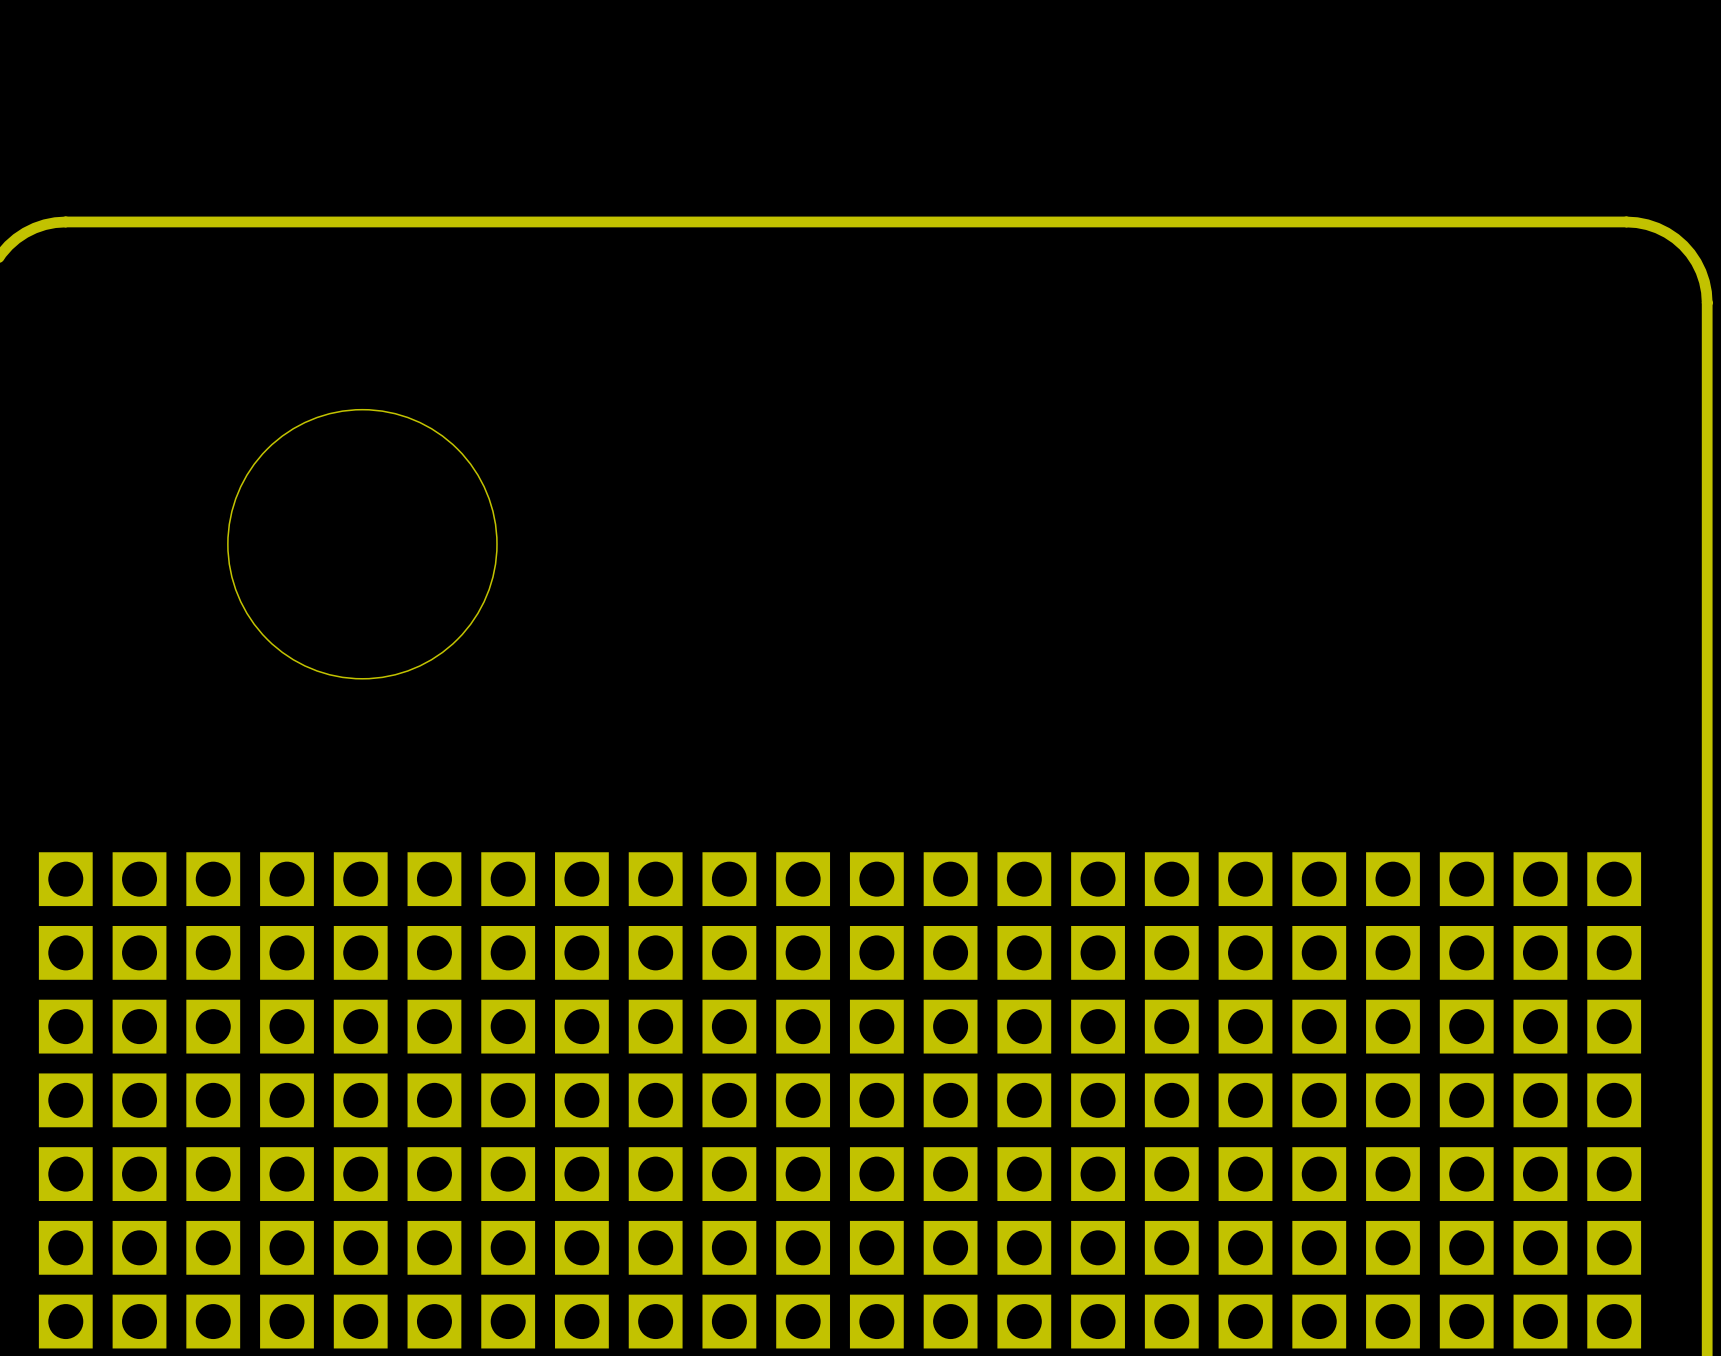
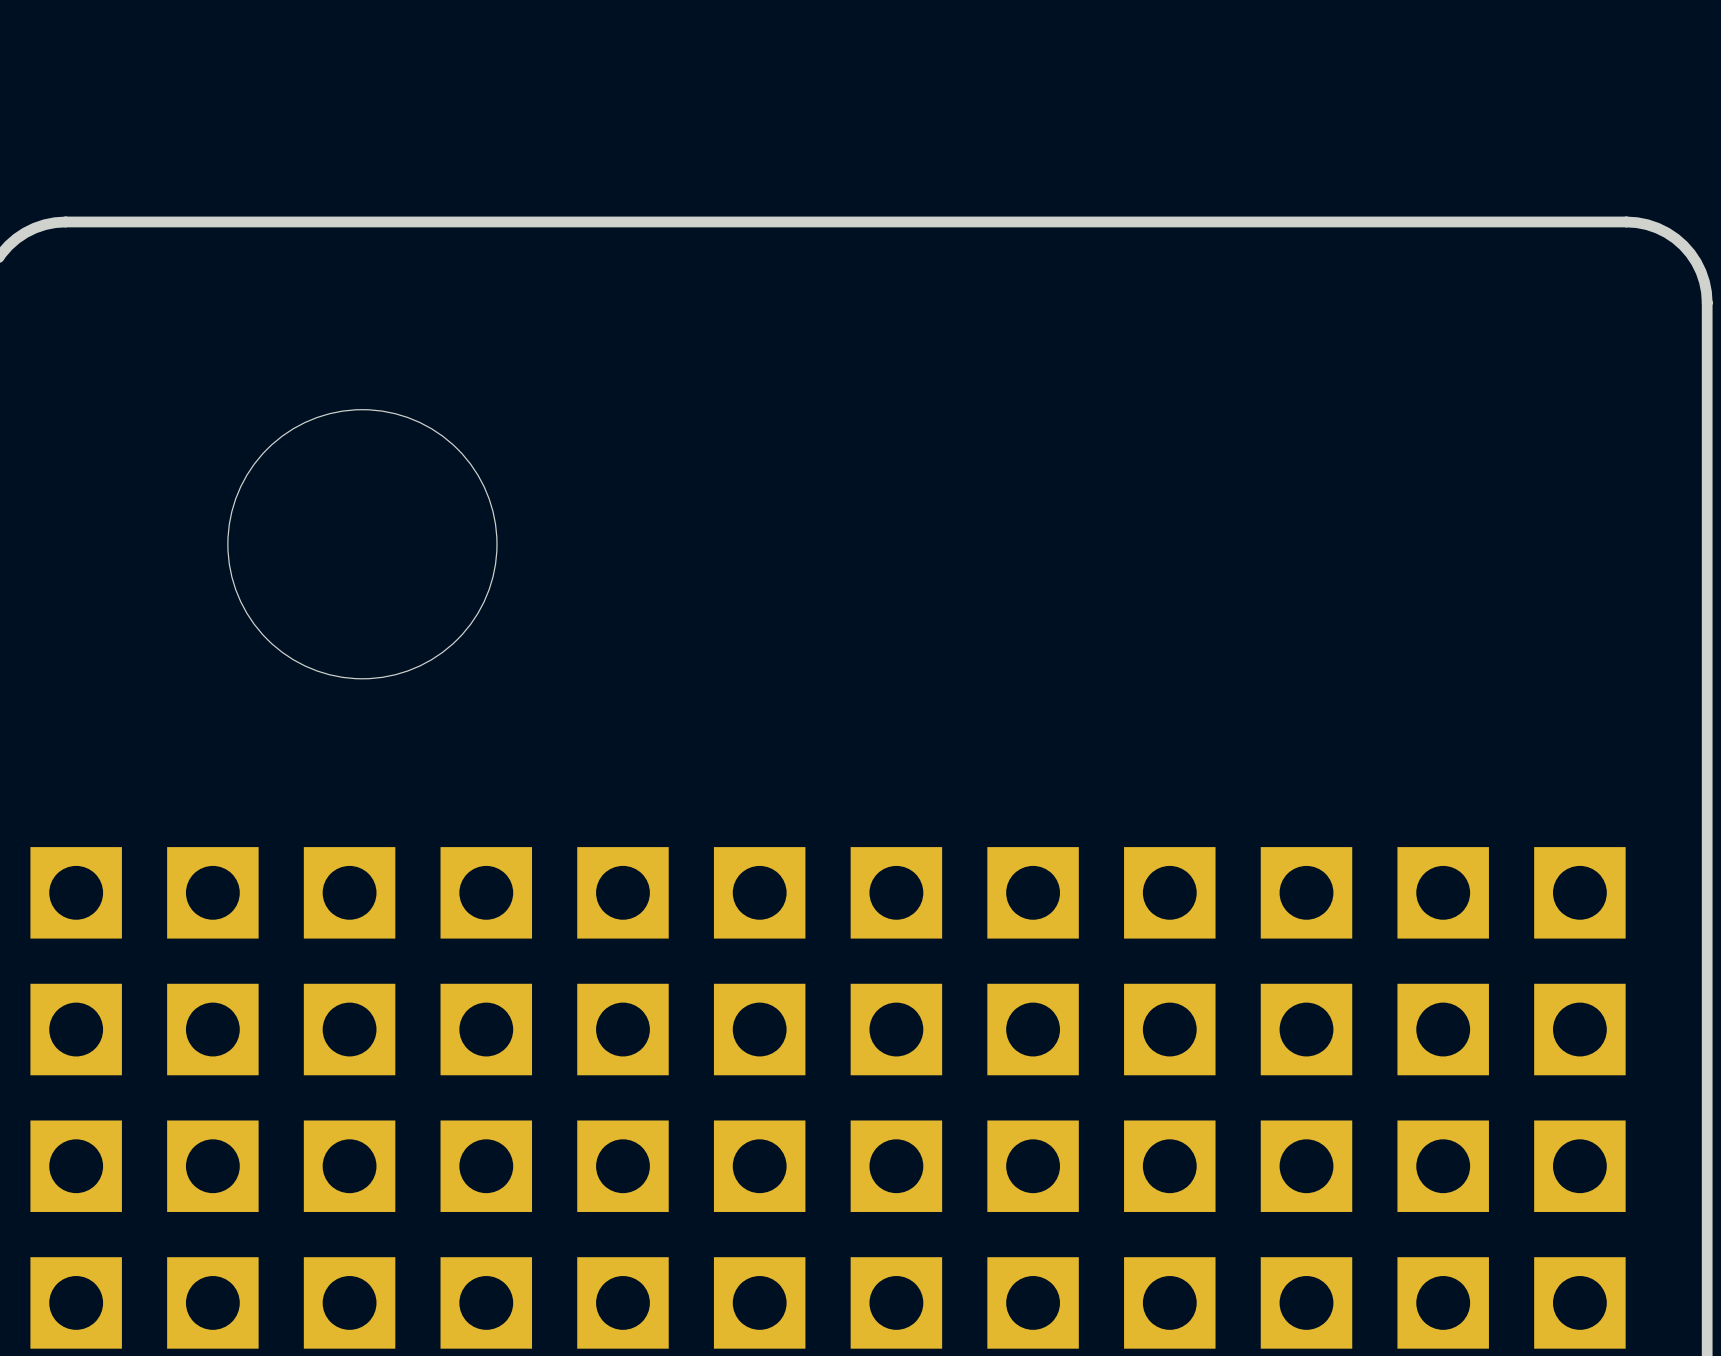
part footprint: [38, 852, 93, 907] -> [30, 847, 122, 939]
part footprint: [186, 852, 241, 907] -> [167, 847, 259, 939]
part footprint: [333, 852, 388, 907] -> [303, 847, 396, 939]
part footprint: [481, 852, 536, 907] -> [440, 847, 533, 939]
part footprint: [849, 852, 904, 907] -> [850, 847, 943, 939]
part footprint: [997, 852, 1052, 907] -> [987, 847, 1079, 939]
part footprint: [1144, 852, 1199, 907] -> [1124, 847, 1216, 939]
part footprint: [1292, 852, 1347, 907] -> [1260, 847, 1353, 939]
part: (139, 879) -> none
part: (286, 879) -> none
part: (434, 879) -> none
part: (581, 879) -> none
part: (655, 879) -> none
part: (729, 879) -> none
part: (803, 879) -> none
part: (950, 879) -> none
part: (1098, 879) -> none
part: (1245, 879) -> none
part: (1392, 879) -> none
part: (1466, 879) -> none
part: (1540, 879) -> none
part: (1614, 879) -> none
part: none -> (622, 892)
part: none -> (759, 892)
part: none -> (1443, 892)
part: none -> (1579, 892)
part: (65, 952) -> none
part: (139, 952) -> none
part: (213, 952) -> none
part: (286, 952) -> none
part: (360, 952) -> none
part: (434, 952) -> none
part: (508, 952) -> none
part: (581, 952) -> none
part: (655, 952) -> none
part: (729, 952) -> none
part: (803, 952) -> none
part: (876, 952) -> none
part: (950, 952) -> none
part: (1024, 952) -> none
part: (1098, 952) -> none
part: (1171, 952) -> none
part: (1245, 952) -> none
part: (1319, 952) -> none
part: (1392, 952) -> none
part: (1466, 952) -> none
part: (1540, 952) -> none
part: (1614, 952) -> none
part footprint: [38, 999, 93, 1054] -> [30, 983, 122, 1076]
part footprint: [186, 999, 241, 1054] -> [167, 983, 259, 1076]
part footprint: [333, 999, 388, 1054] -> [303, 983, 396, 1076]
part footprint: [481, 999, 536, 1054] -> [440, 983, 533, 1076]
part footprint: [849, 999, 904, 1054] -> [850, 983, 943, 1076]
part footprint: [997, 999, 1052, 1054] -> [987, 983, 1079, 1076]
part footprint: [1144, 999, 1199, 1054] -> [1124, 983, 1216, 1076]
part footprint: [1292, 999, 1347, 1054] -> [1260, 983, 1353, 1076]
part footprint: [1439, 999, 1494, 1054] -> [1397, 983, 1489, 1076]
part: (139, 1026) -> none
part: (286, 1026) -> none
part: (434, 1026) -> none
part: (581, 1026) -> none
part: (655, 1026) -> none
part: (729, 1026) -> none
part: (803, 1026) -> none
part: (950, 1026) -> none
part: (1098, 1026) -> none
part: (1245, 1026) -> none
part: (1392, 1026) -> none
part: (1540, 1026) -> none
part: (1614, 1026) -> none
part: none -> (622, 1029)
part: none -> (759, 1029)
part: none -> (1579, 1029)
part: (65, 1100) -> none
part: (139, 1100) -> none
part: (213, 1100) -> none
part: (286, 1100) -> none
part: (360, 1100) -> none
part: (434, 1100) -> none
part: (508, 1100) -> none
part: (581, 1100) -> none
part: (655, 1100) -> none
part: (729, 1100) -> none
part: (803, 1100) -> none
part: (876, 1100) -> none
part: (950, 1100) -> none
part: (1024, 1100) -> none
part: (1098, 1100) -> none
part: (1171, 1100) -> none
part: (1245, 1100) -> none
part: (1319, 1100) -> none
part: (1392, 1100) -> none
part: (1466, 1100) -> none
part: (1540, 1100) -> none
part: (1614, 1100) -> none
part footprint: [38, 1147, 93, 1202] -> [30, 1120, 122, 1212]
part footprint: [186, 1147, 241, 1202] -> [167, 1120, 259, 1212]
part footprint: [333, 1147, 388, 1202] -> [303, 1120, 396, 1212]
part footprint: [481, 1147, 536, 1202] -> [440, 1120, 533, 1212]
part footprint: [849, 1147, 904, 1202] -> [850, 1120, 943, 1212]
part footprint: [997, 1147, 1052, 1202] -> [987, 1120, 1079, 1212]
part footprint: [1144, 1147, 1199, 1202] -> [1124, 1120, 1216, 1212]
part footprint: [1292, 1147, 1347, 1202] -> [1260, 1120, 1353, 1212]
part footprint: [1439, 1147, 1494, 1202] -> [1397, 1120, 1489, 1212]
part: none -> (622, 1166)
part: none -> (759, 1166)
part: none -> (1579, 1166)
part: (139, 1174) -> none
part: (286, 1174) -> none
part: (434, 1174) -> none
part: (581, 1174) -> none
part: (655, 1174) -> none
part: (729, 1174) -> none
part: (803, 1174) -> none
part: (950, 1174) -> none
part: (1098, 1174) -> none
part: (1245, 1174) -> none
part: (1392, 1174) -> none
part: (1540, 1174) -> none
part: (1614, 1174) -> none
part: (65, 1247) -> none
part: (139, 1247) -> none
part: (213, 1247) -> none
part: (286, 1247) -> none
part: (360, 1247) -> none
part: (434, 1247) -> none
part: (508, 1247) -> none
part: (581, 1247) -> none
part: (655, 1247) -> none
part: (729, 1247) -> none
part: (803, 1247) -> none
part: (876, 1247) -> none
part: (950, 1247) -> none
part: (1024, 1247) -> none
part: (1098, 1247) -> none
part: (1171, 1247) -> none
part: (1245, 1247) -> none
part: (1319, 1247) -> none
part: (1392, 1247) -> none
part: (1466, 1247) -> none
part: (1540, 1247) -> none
part: (1614, 1247) -> none
part footprint: [38, 1294, 93, 1349] -> [30, 1257, 122, 1349]
part footprint: [186, 1294, 241, 1349] -> [167, 1257, 259, 1349]
part footprint: [333, 1294, 388, 1349] -> [303, 1257, 396, 1349]
part footprint: [849, 1294, 904, 1349] -> [850, 1257, 943, 1349]
part footprint: [997, 1294, 1052, 1349] -> [987, 1257, 1079, 1349]
part footprint: [1144, 1294, 1199, 1349] -> [1124, 1257, 1216, 1349]
part footprint: [1292, 1294, 1347, 1349] -> [1260, 1257, 1353, 1349]
part: none -> (486, 1302)
part: none -> (622, 1302)
part: none -> (759, 1302)
part: none -> (1443, 1302)
part: none -> (1579, 1302)
part: (139, 1321) -> none
part: (286, 1321) -> none
part: (434, 1321) -> none
part: (508, 1321) -> none
part: (581, 1321) -> none
part: (655, 1321) -> none
part: (729, 1321) -> none
part: (803, 1321) -> none
part: (950, 1321) -> none
part: (1098, 1321) -> none
part: (1245, 1321) -> none
part: (1392, 1321) -> none
part: (1466, 1321) -> none
part: (1540, 1321) -> none
part: (1614, 1321) -> none

